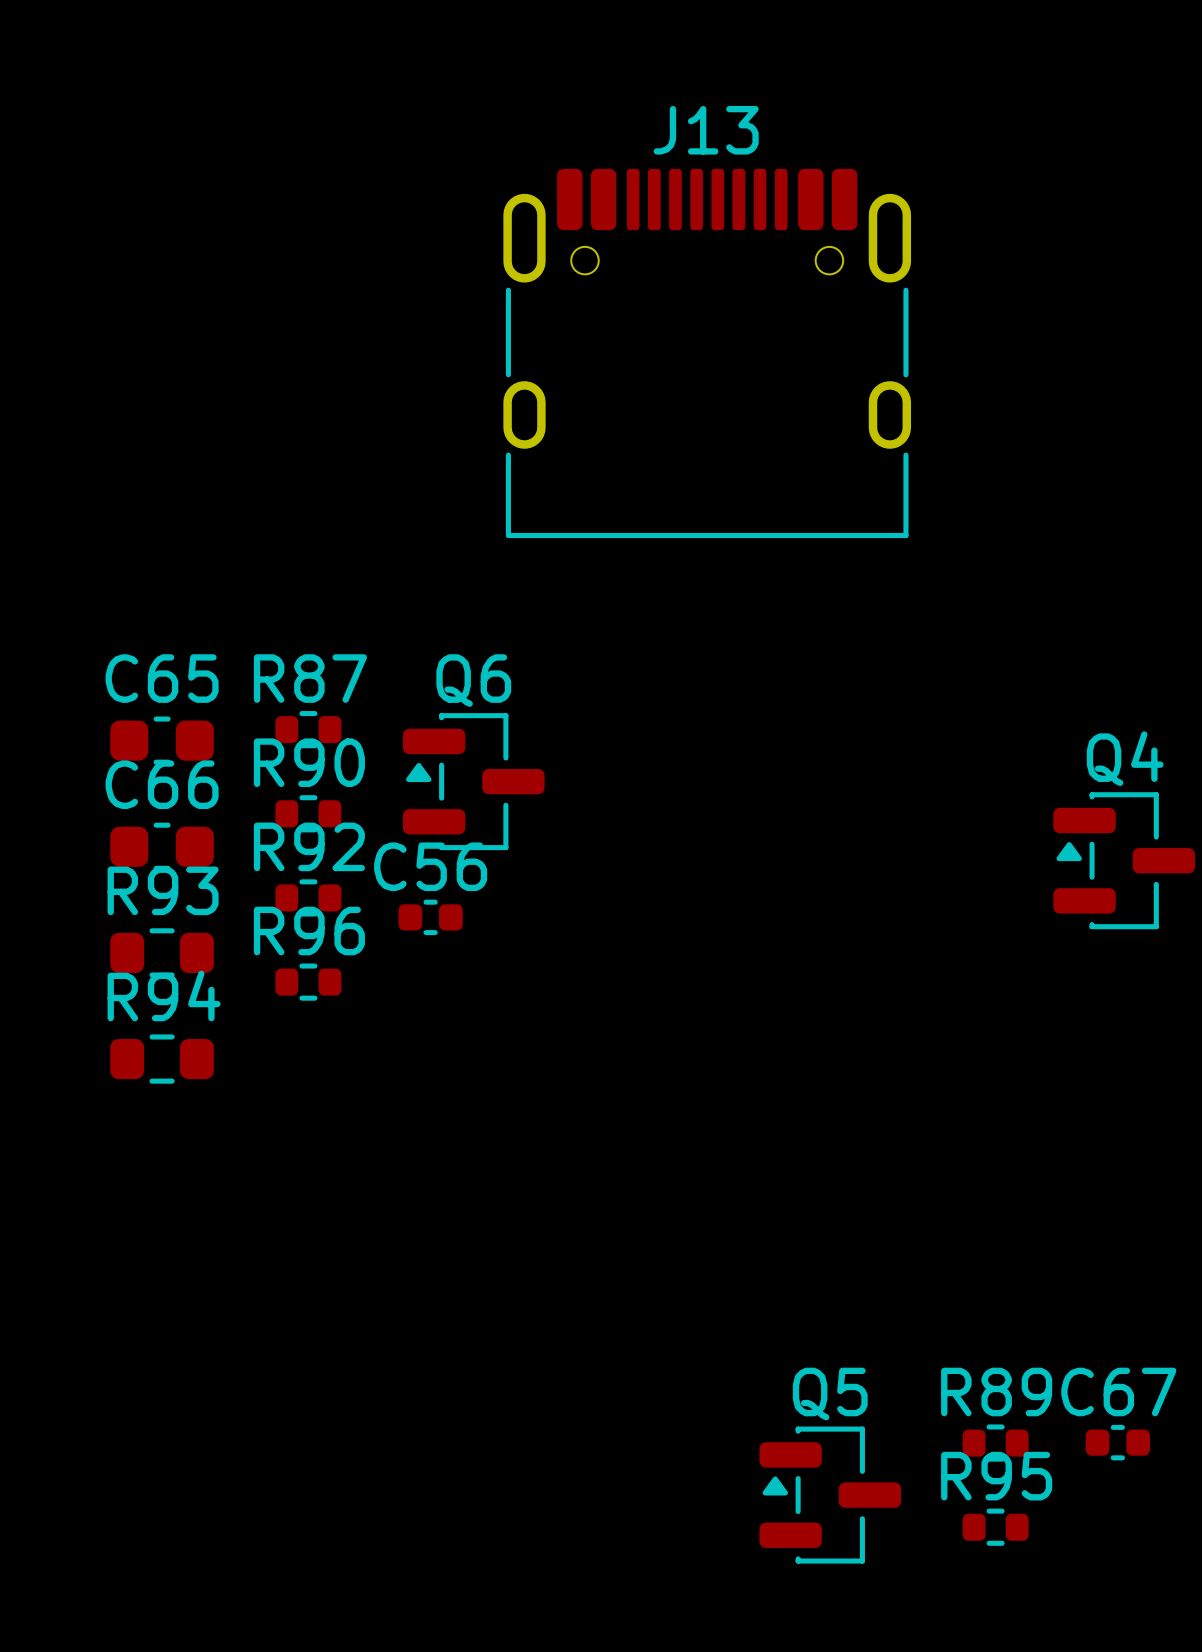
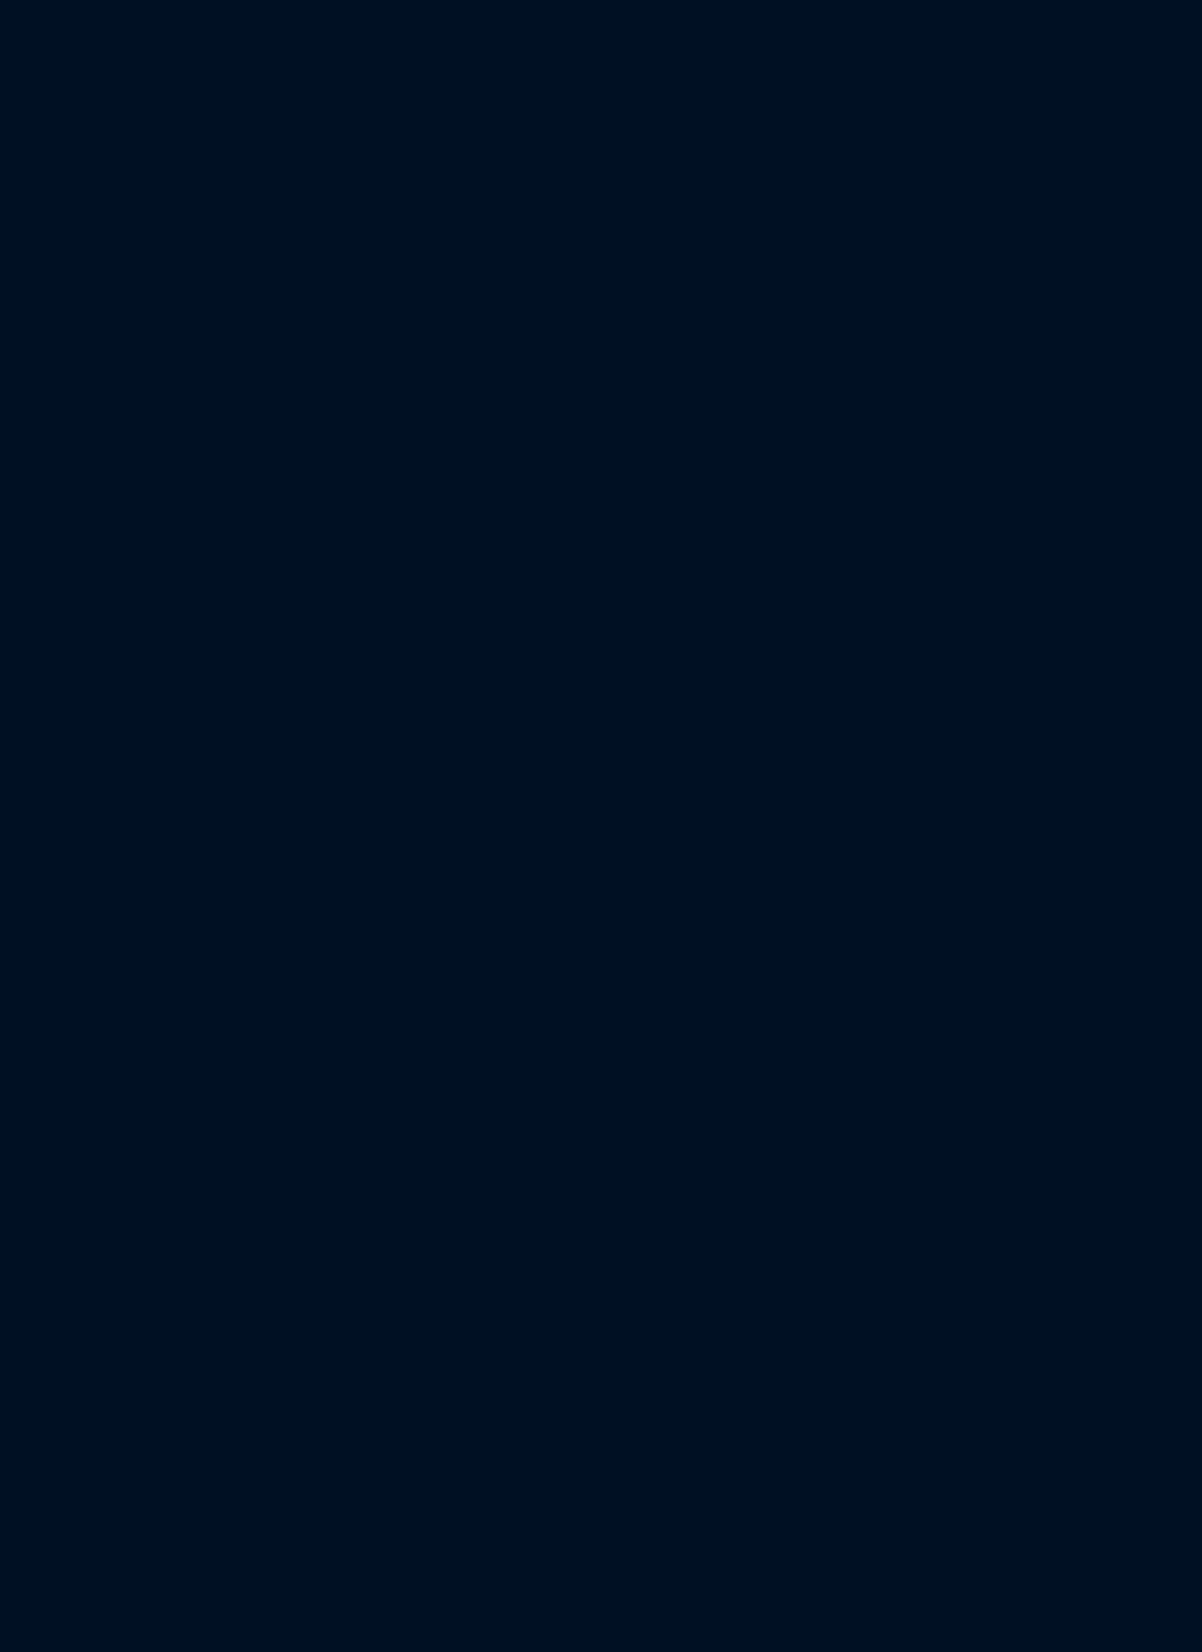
J13: (707, 353) -> none
R87: (308, 729) -> none
C65: (162, 740) -> none
Q6: (473, 781) -> none
R90: (308, 813) -> none
C66: (162, 846) -> none
Q4: (1124, 860) -> none
R92: (308, 897) -> none
C56: (430, 917) -> none
R93: (162, 952) -> none
R96: (308, 982) -> none
R94: (162, 1059) -> none
C67: (1117, 1442) -> none
R89: (995, 1443) -> none
Q5: (830, 1495) -> none
R95: (995, 1527) -> none

